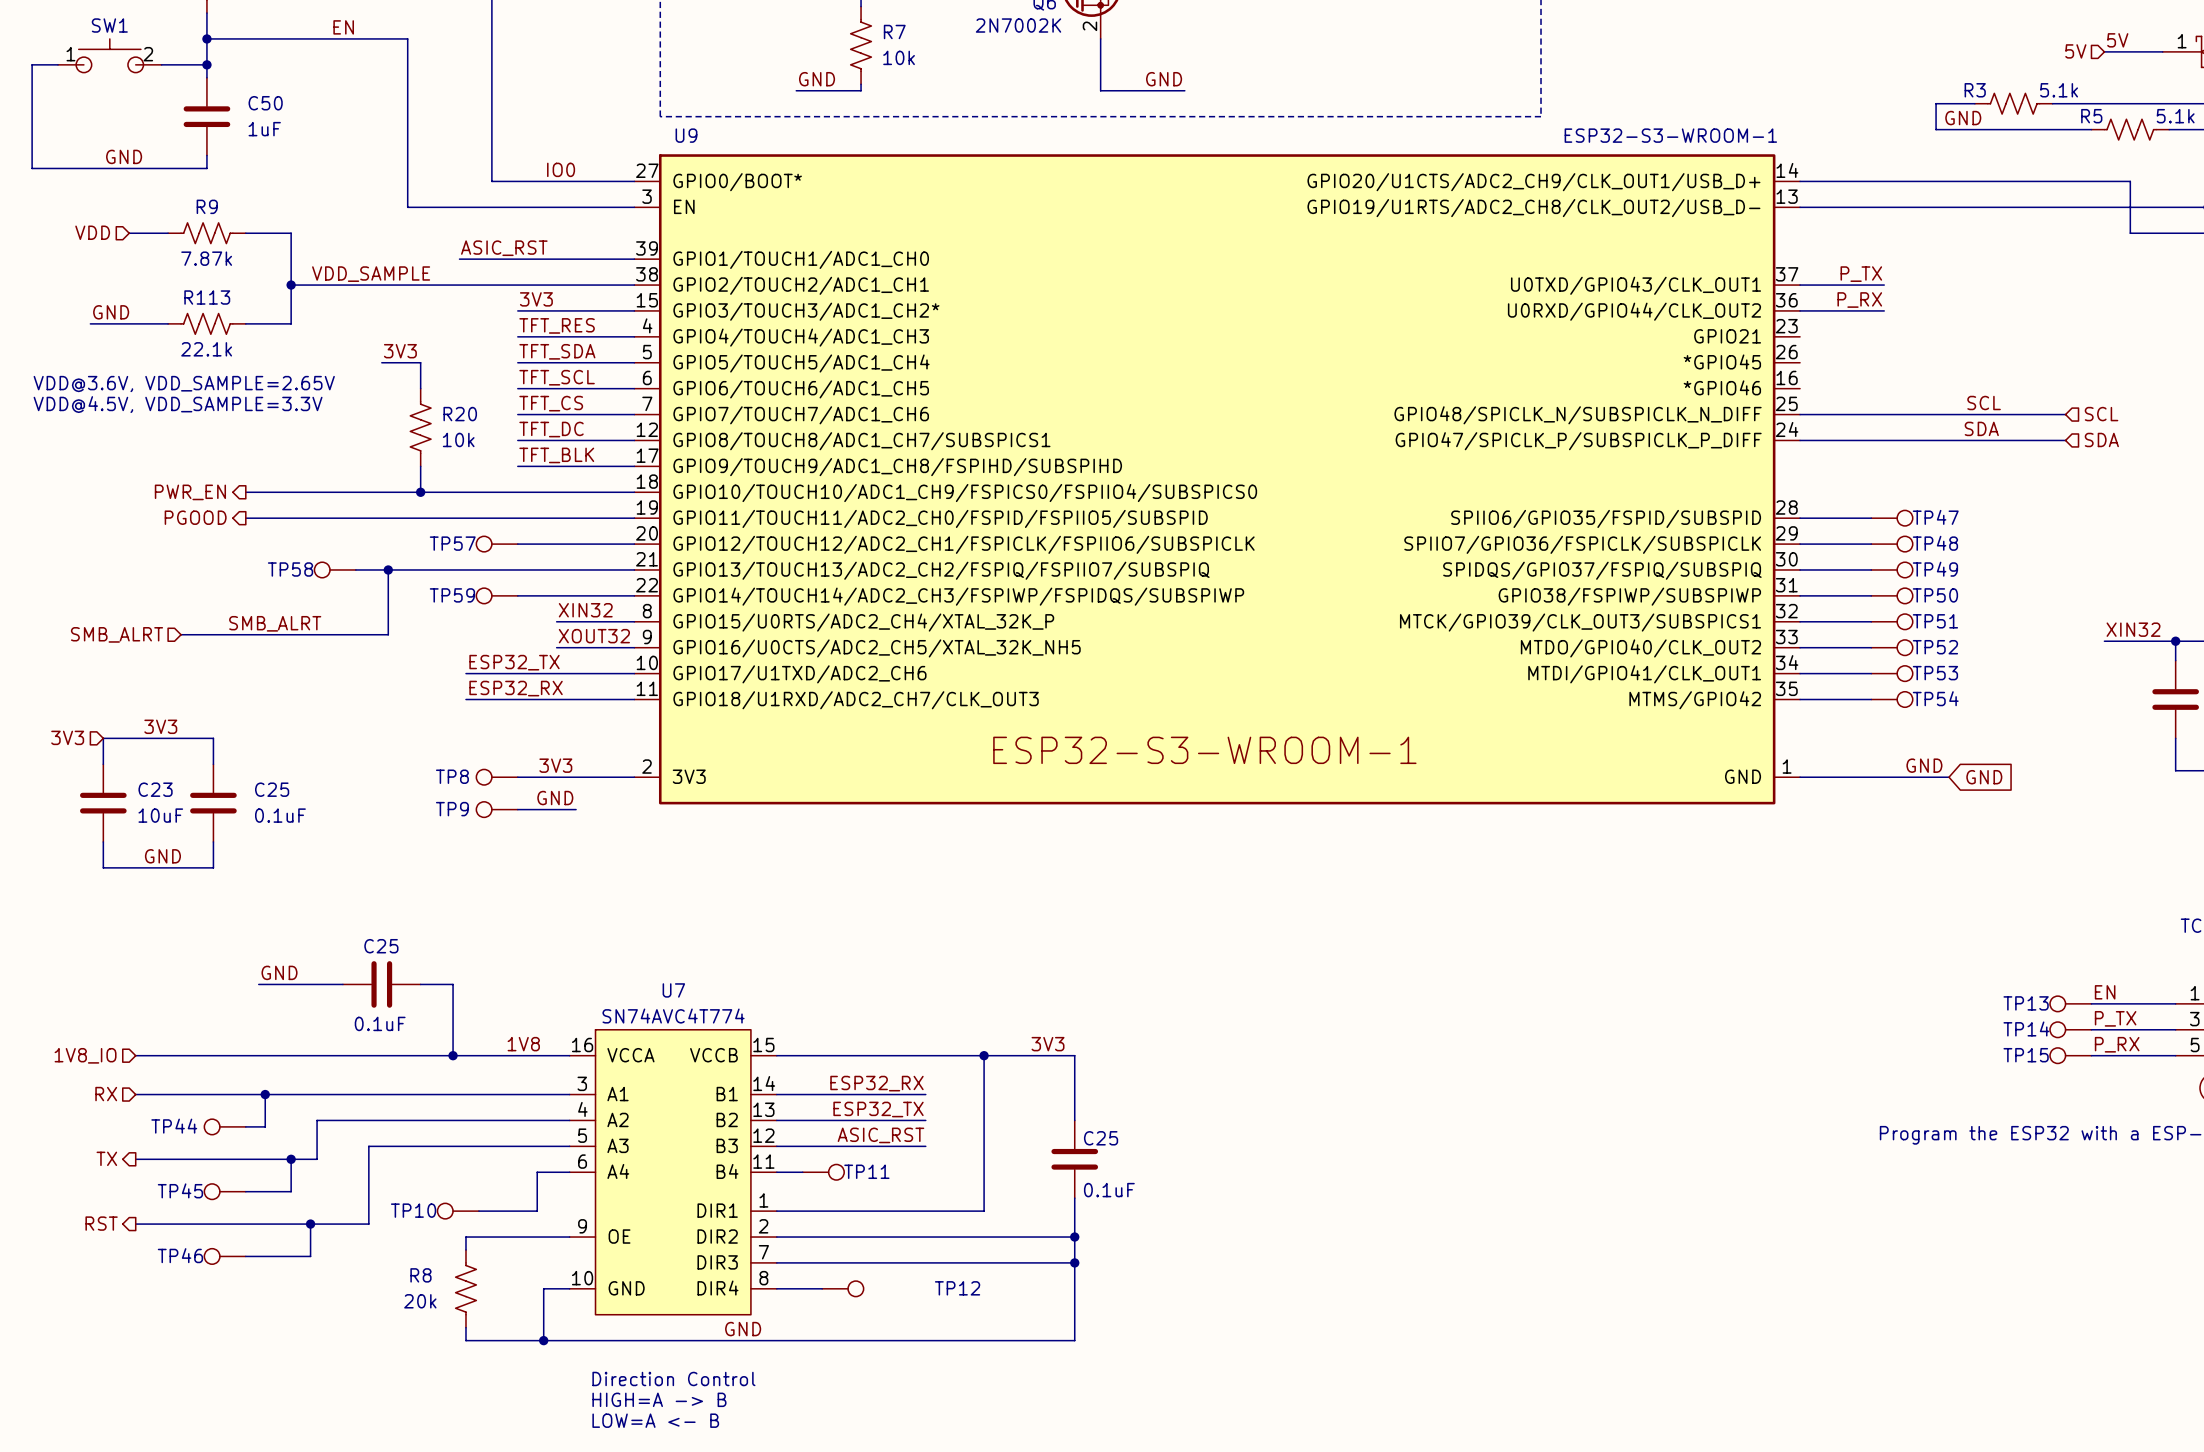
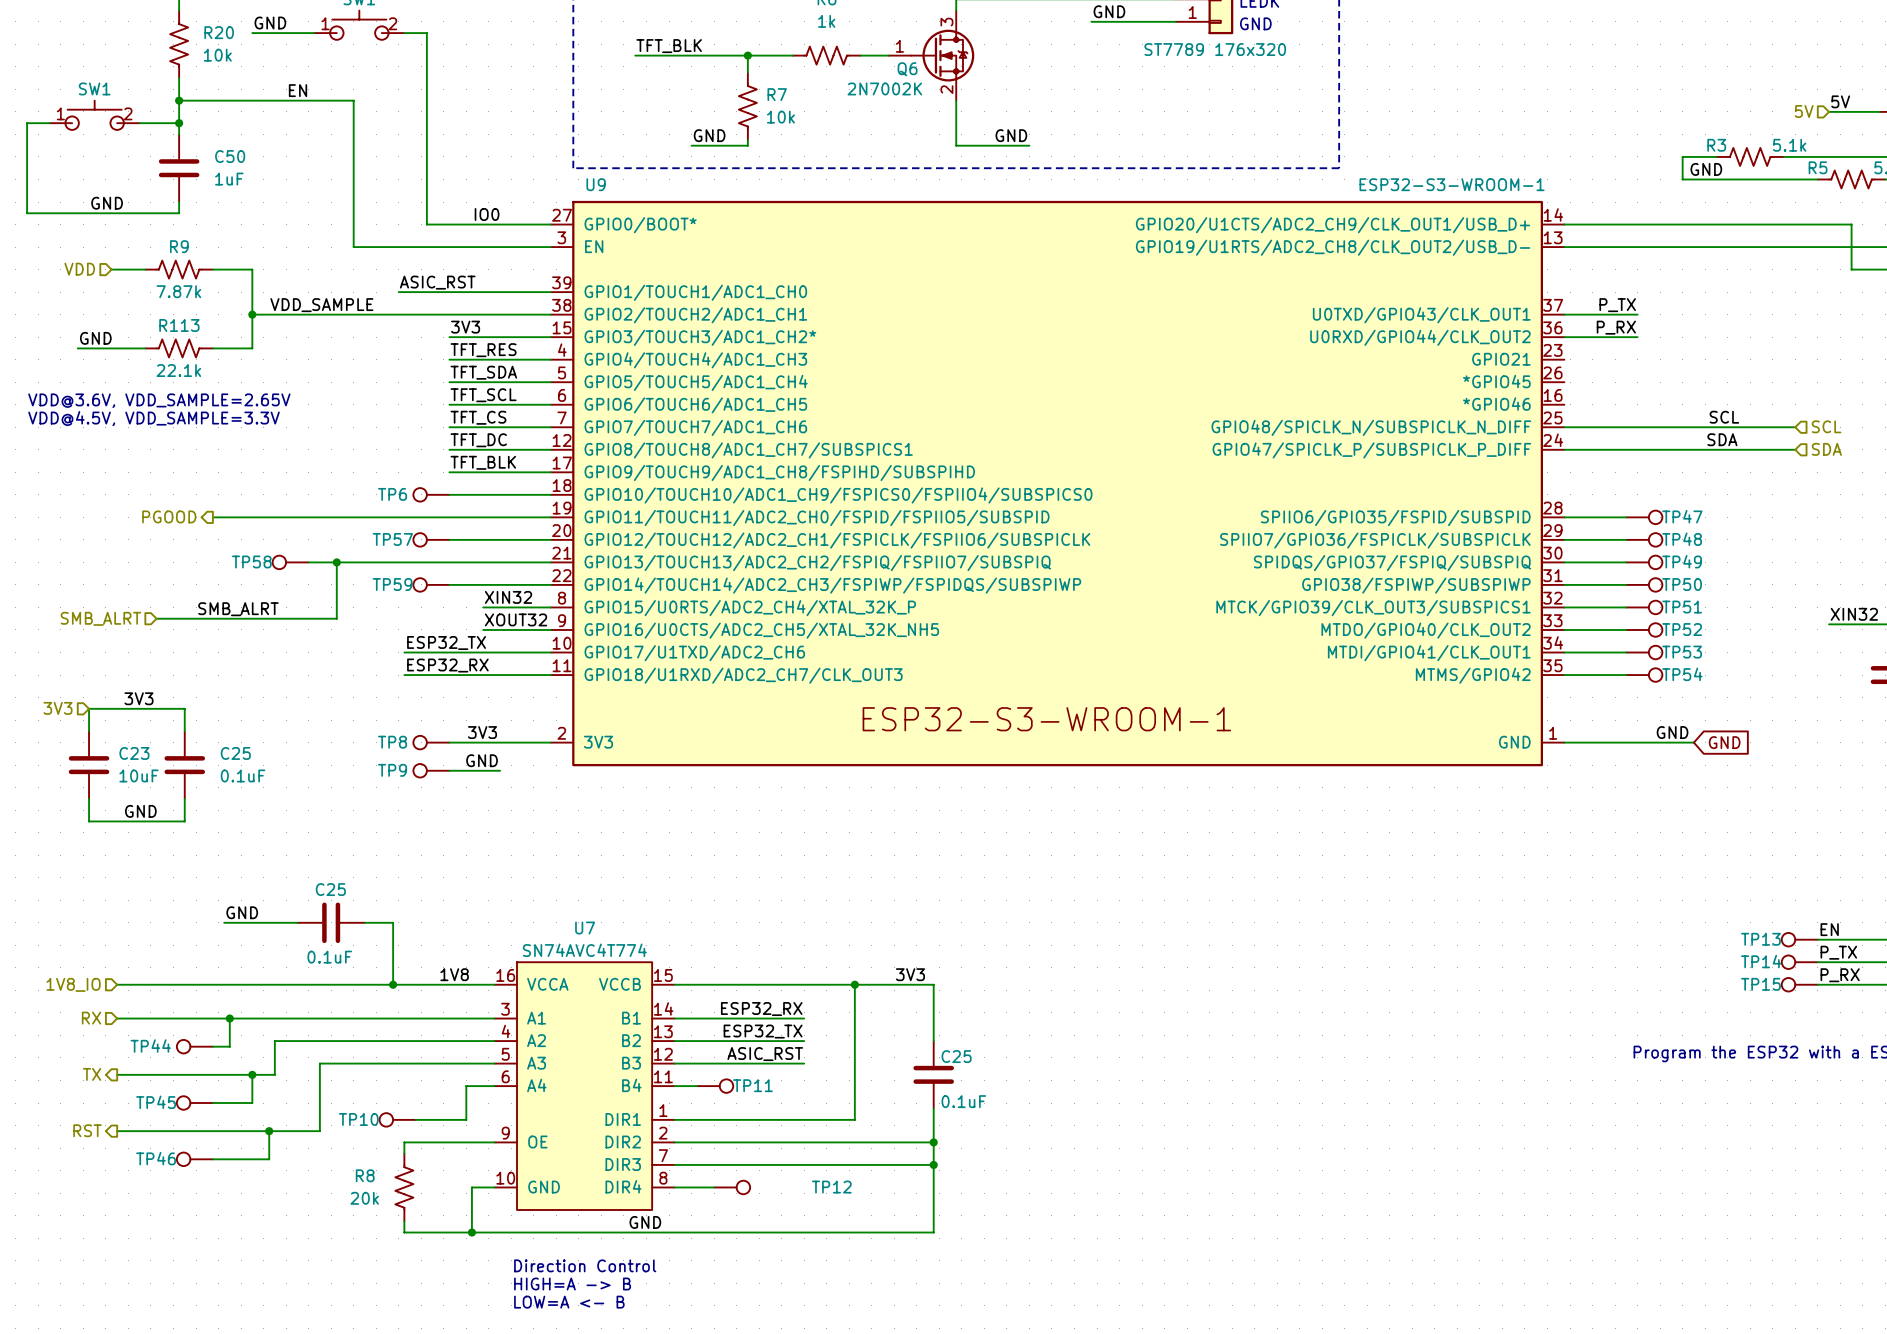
label: 3V3 (400, 351) -> none
wire: (381, 362) (420, 362) (420, 388) -> none
R20: 10k (420, 427) -> none
wire: (420, 466) (420, 492) -> none
hierarchical label: PWR_EN (190, 492) -> none
wire: (245, 492) (517, 492) -> none
junction: (420, 492) -> none
TP6: none -> (431, 494)

